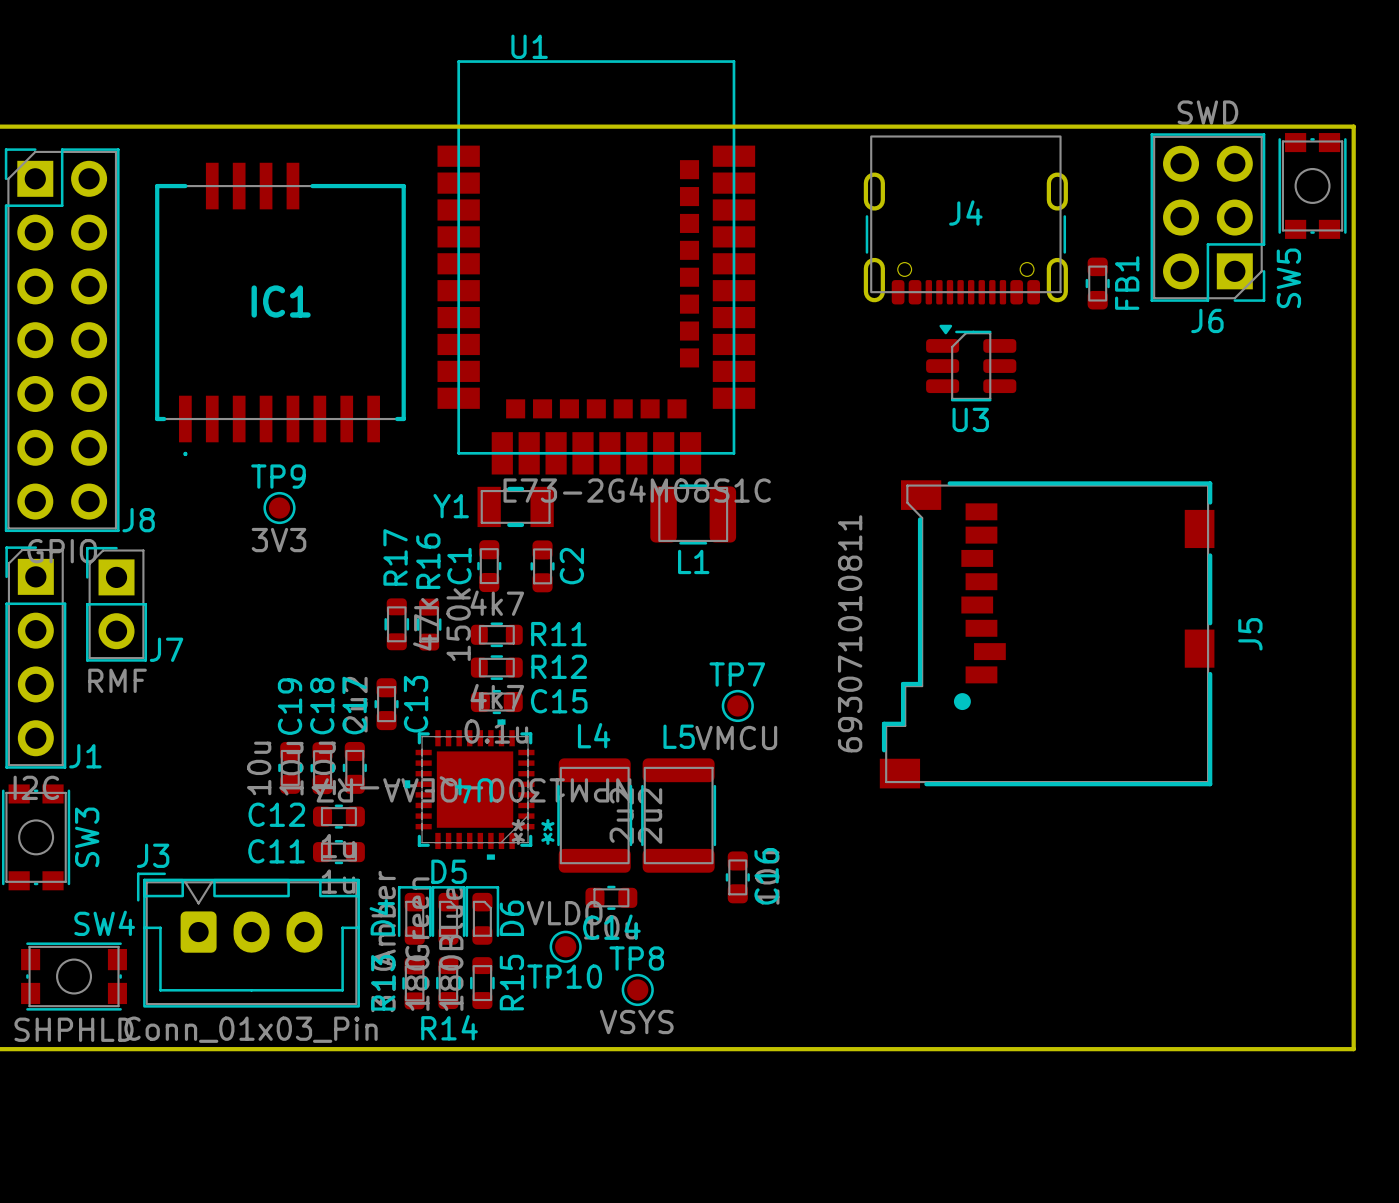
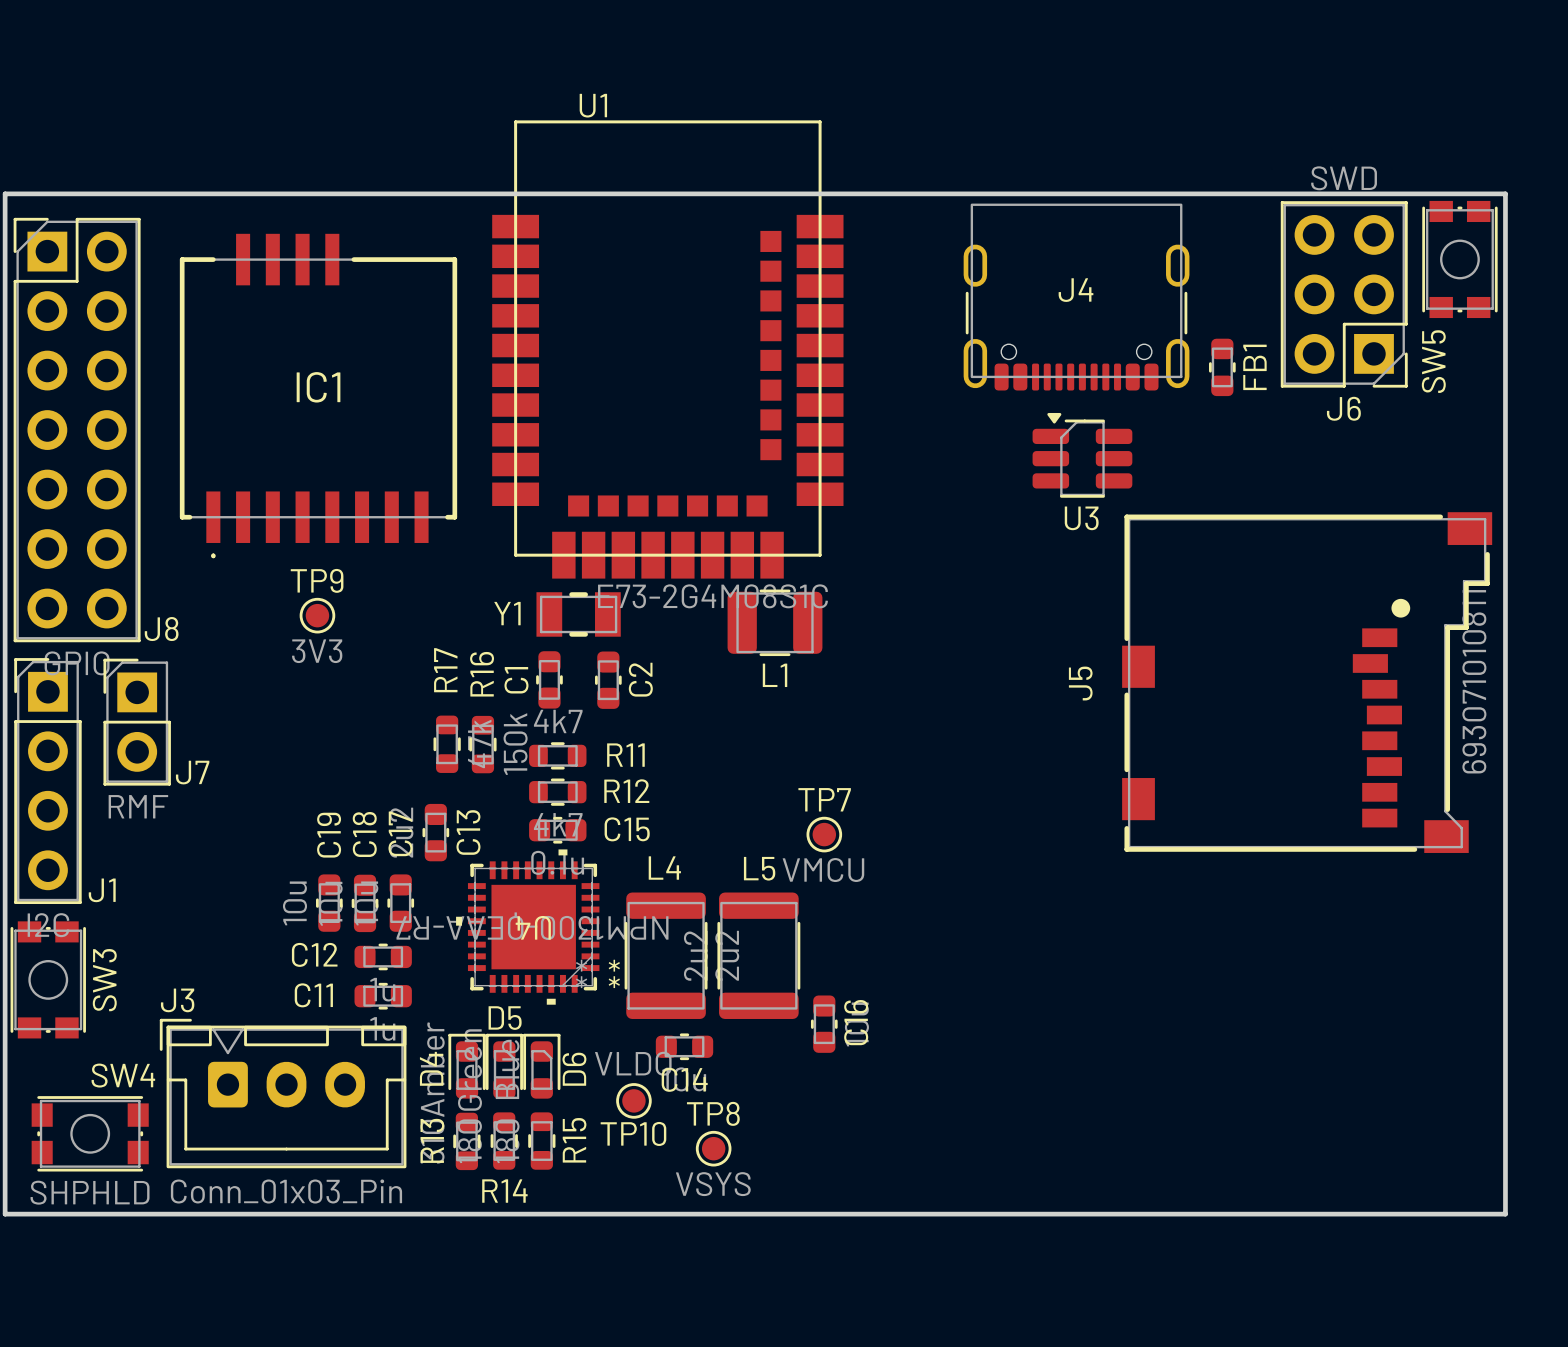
J5 value position: 693071010811 (850, 633) -> 693071010811 (1474, 681)
J5 rotation: 0° (1047, 634) -> 180° (1307, 682)

